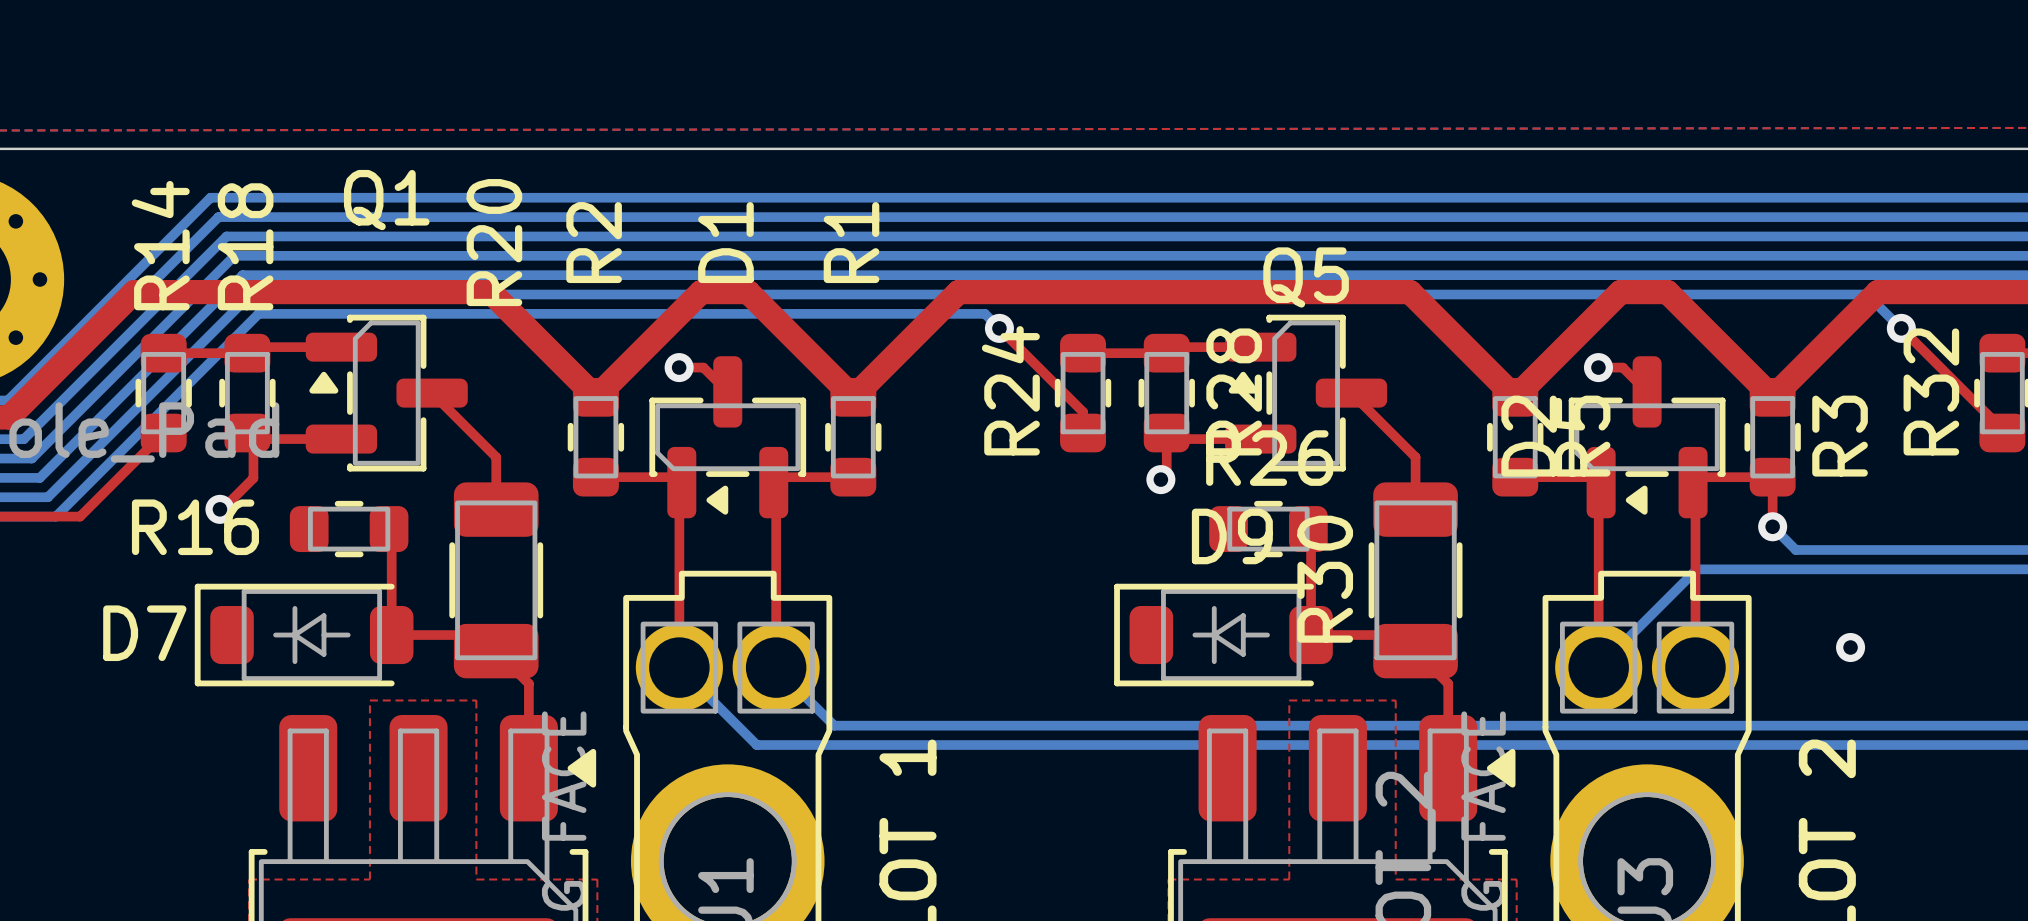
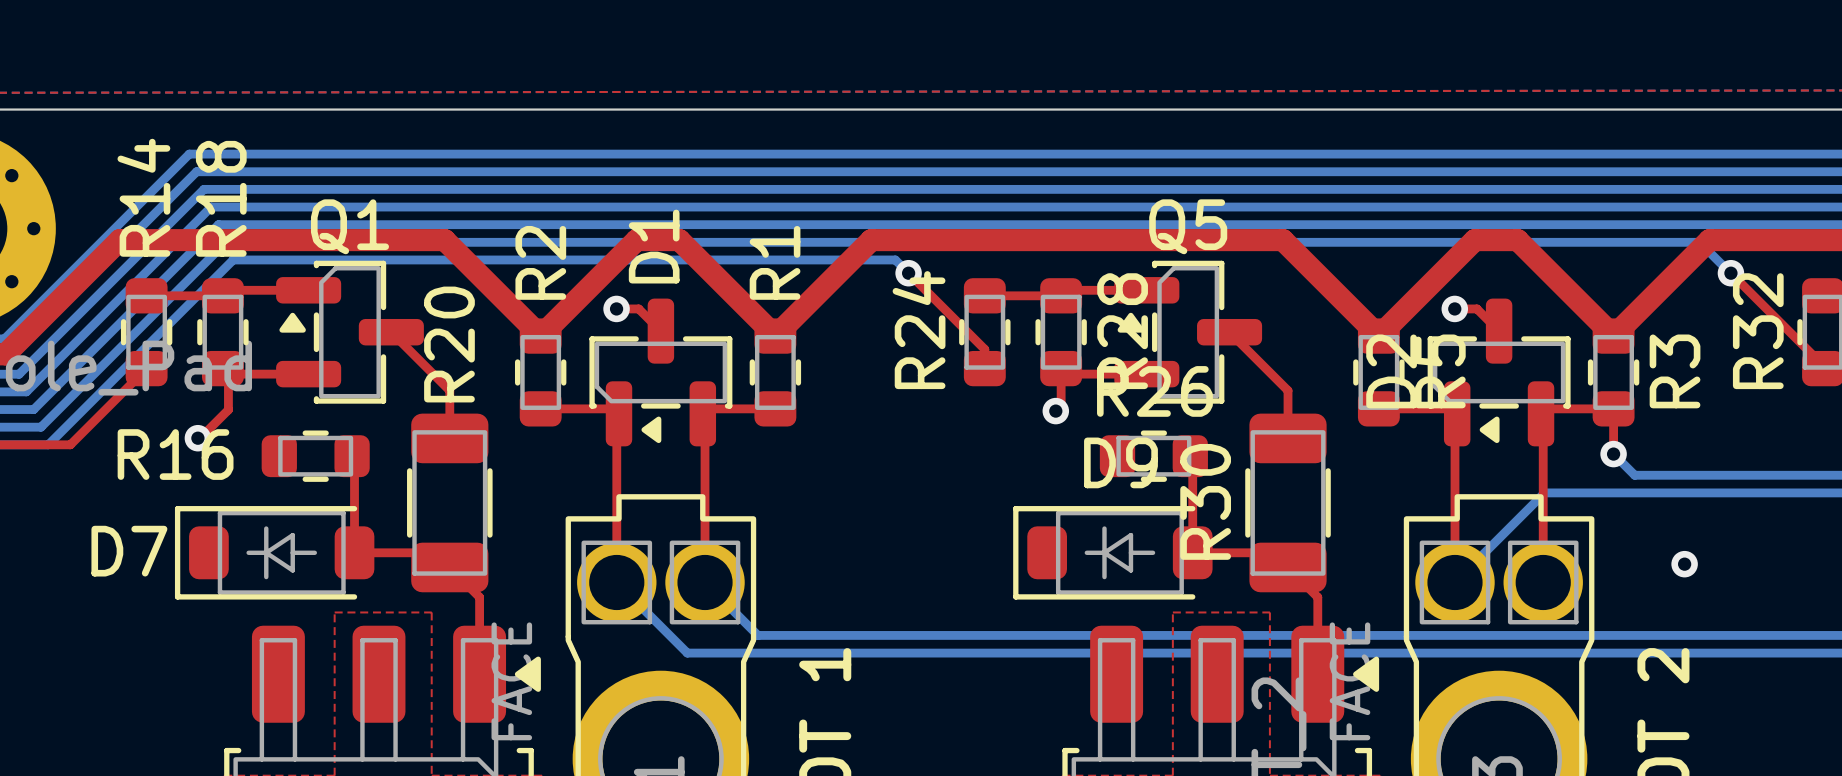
Q1 name position: Q1 (386, 200) -> Q1 (349, 226)
R20 name position: R20 (494, 242) -> R20 (449, 344)
R2 name position: R2 (594, 242) -> R2 (540, 262)
D1 name position: D1 (725, 242) -> D1 (654, 246)
R1 name position: R1 (851, 242) -> R1 (775, 262)

